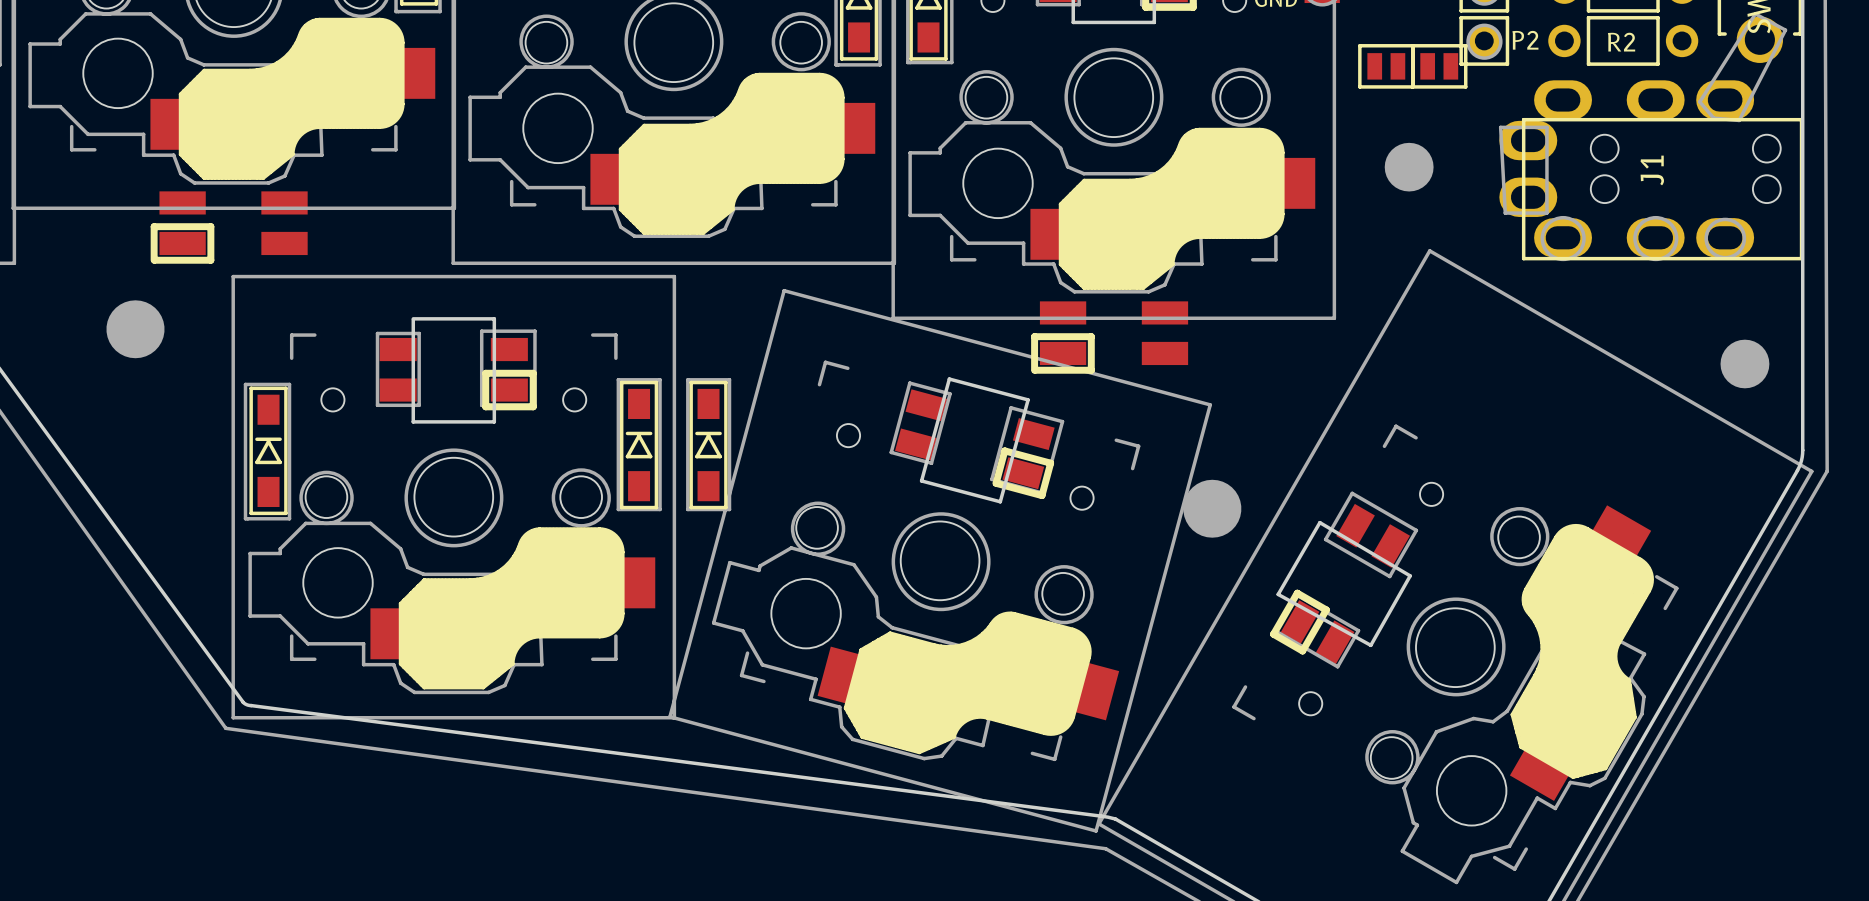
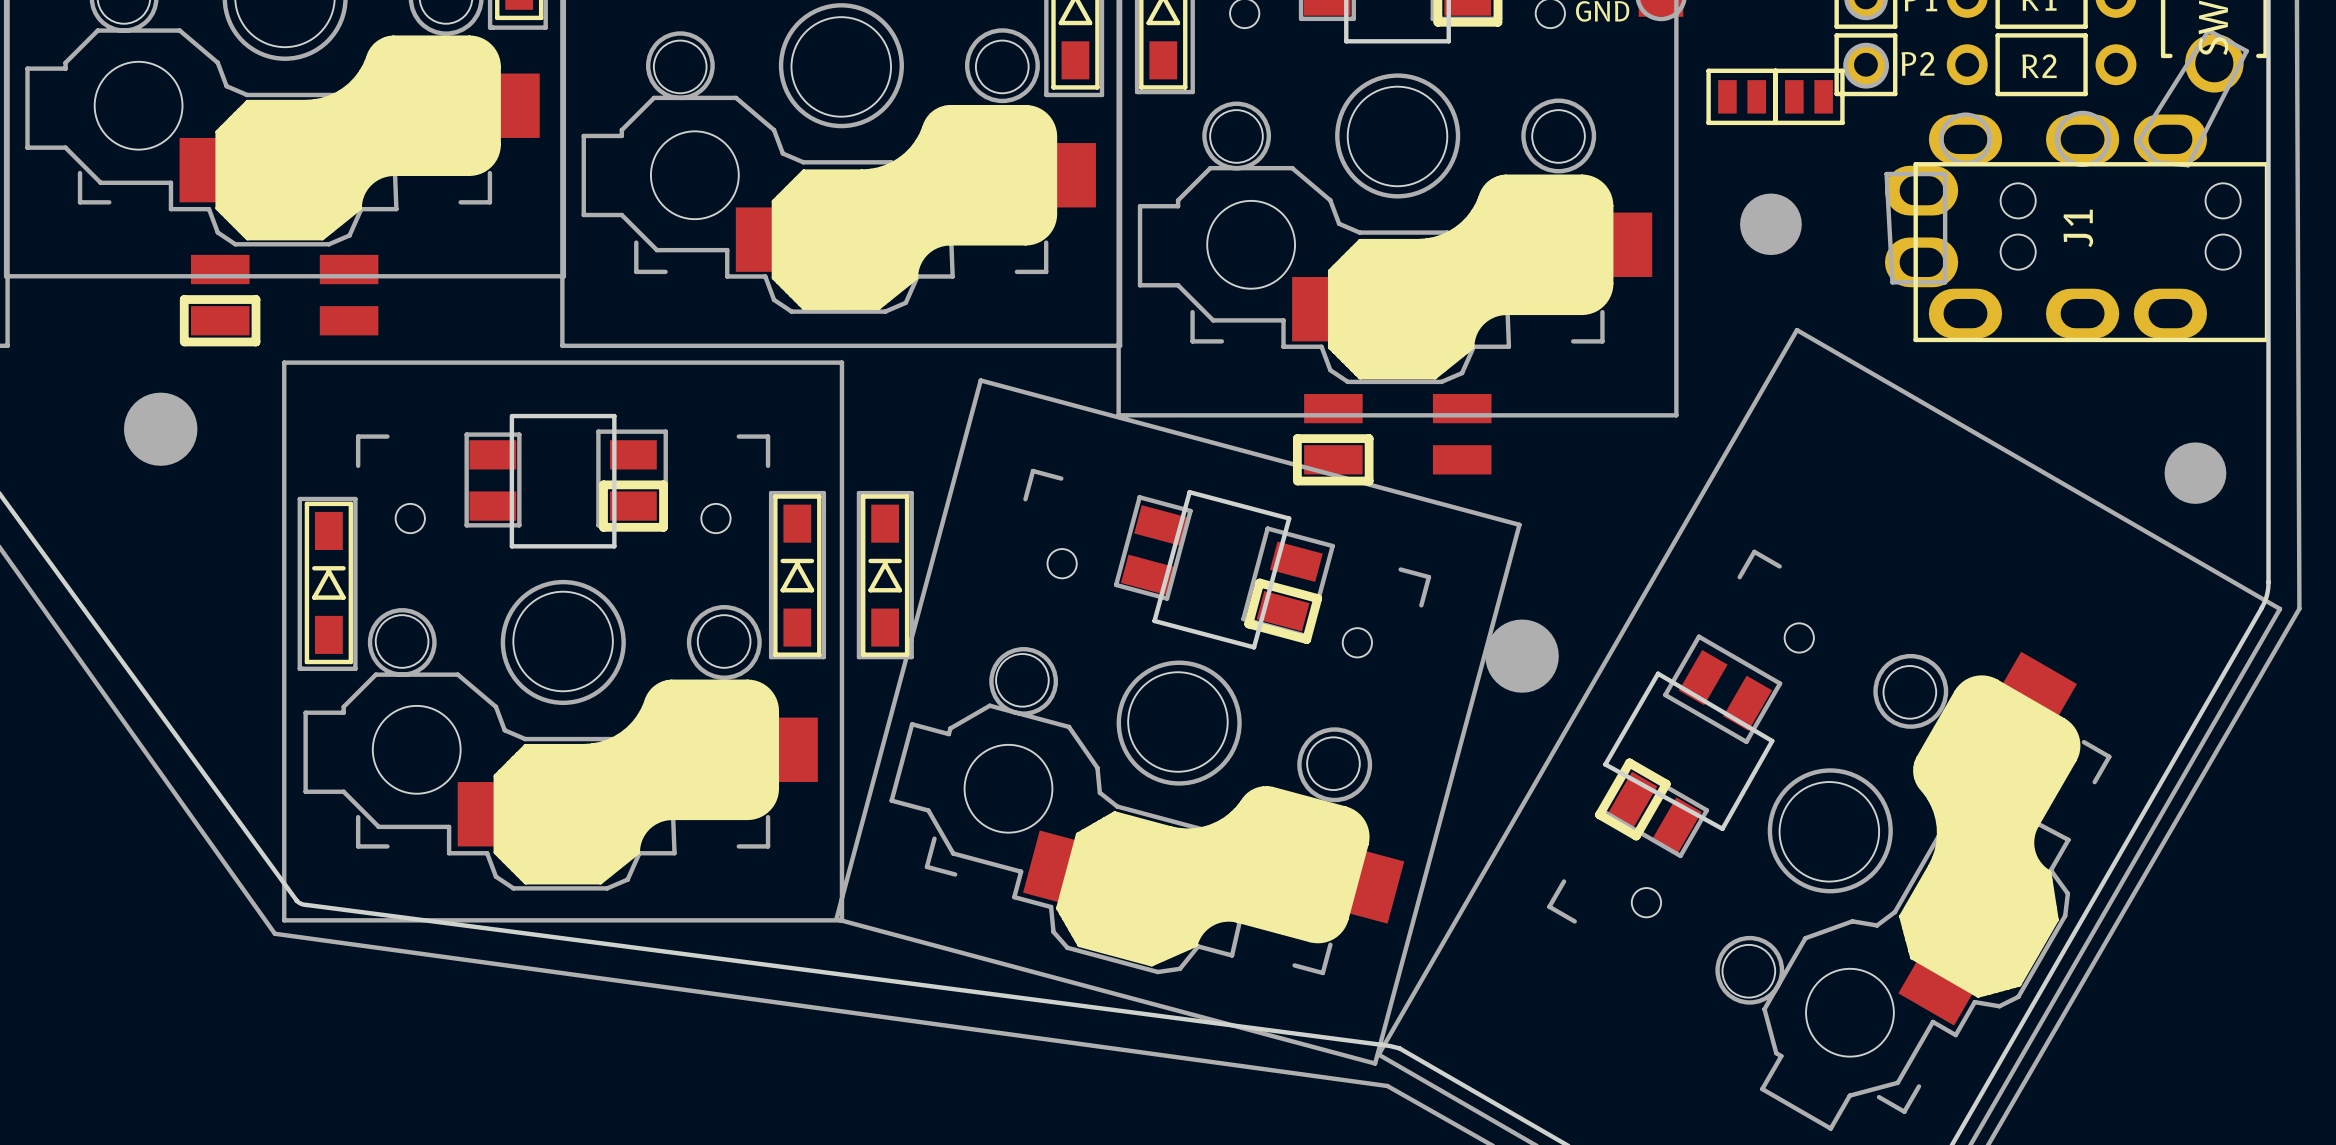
drawing: none -> [2054, 110, 2111, 167]
drawing: none -> [1939, 112, 1993, 166]
drawing: [1540, 215, 1586, 262] -> none
drawing: [1633, 215, 1747, 262] -> none

